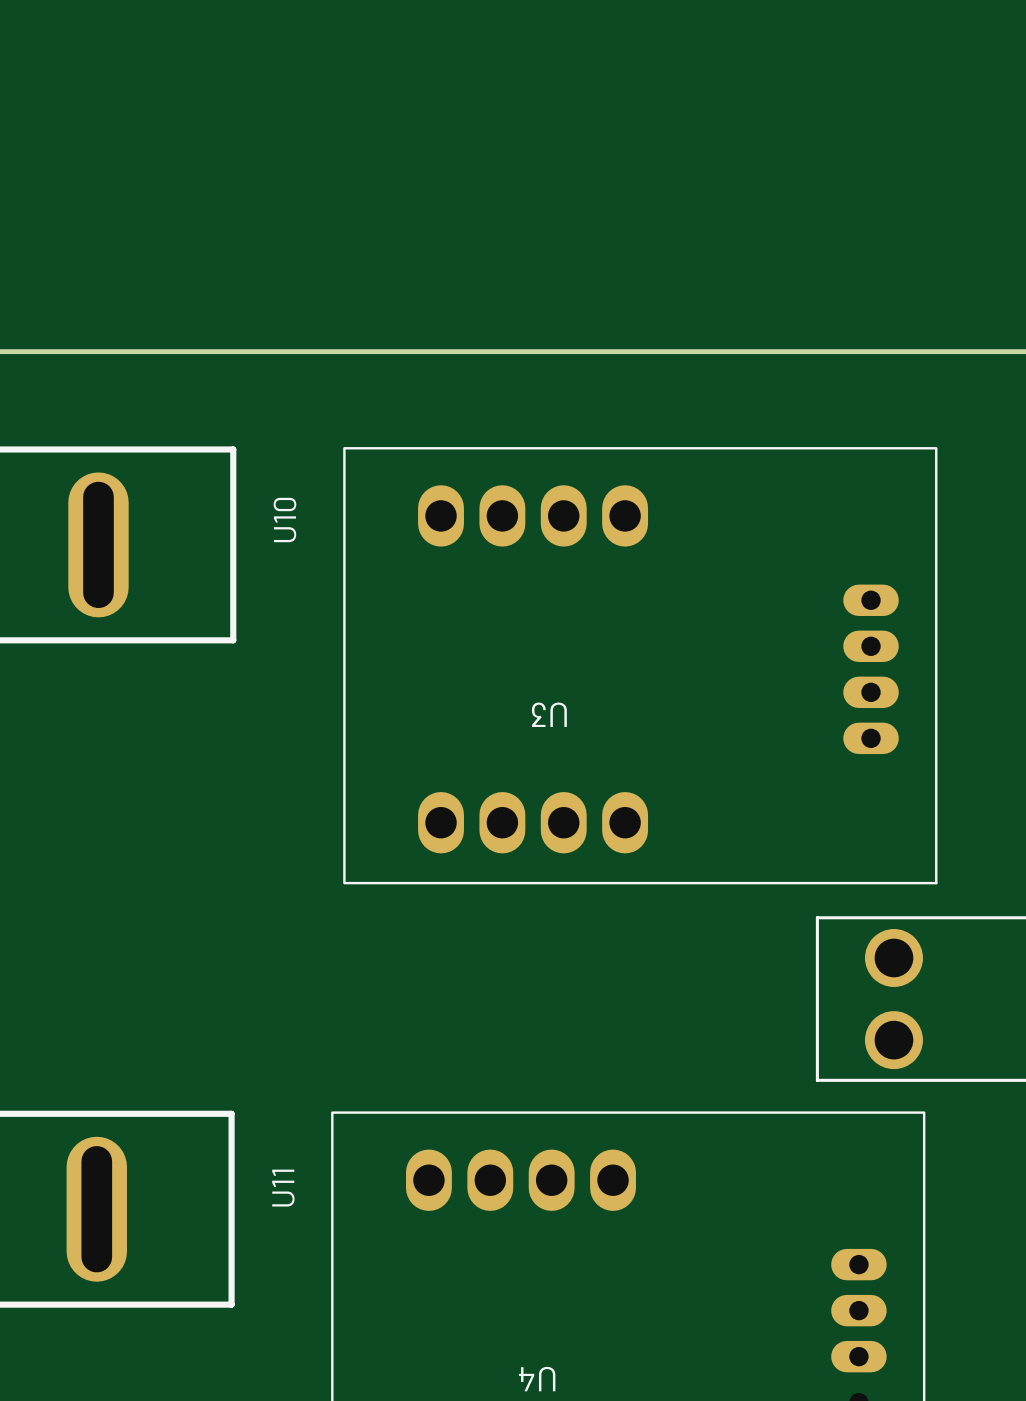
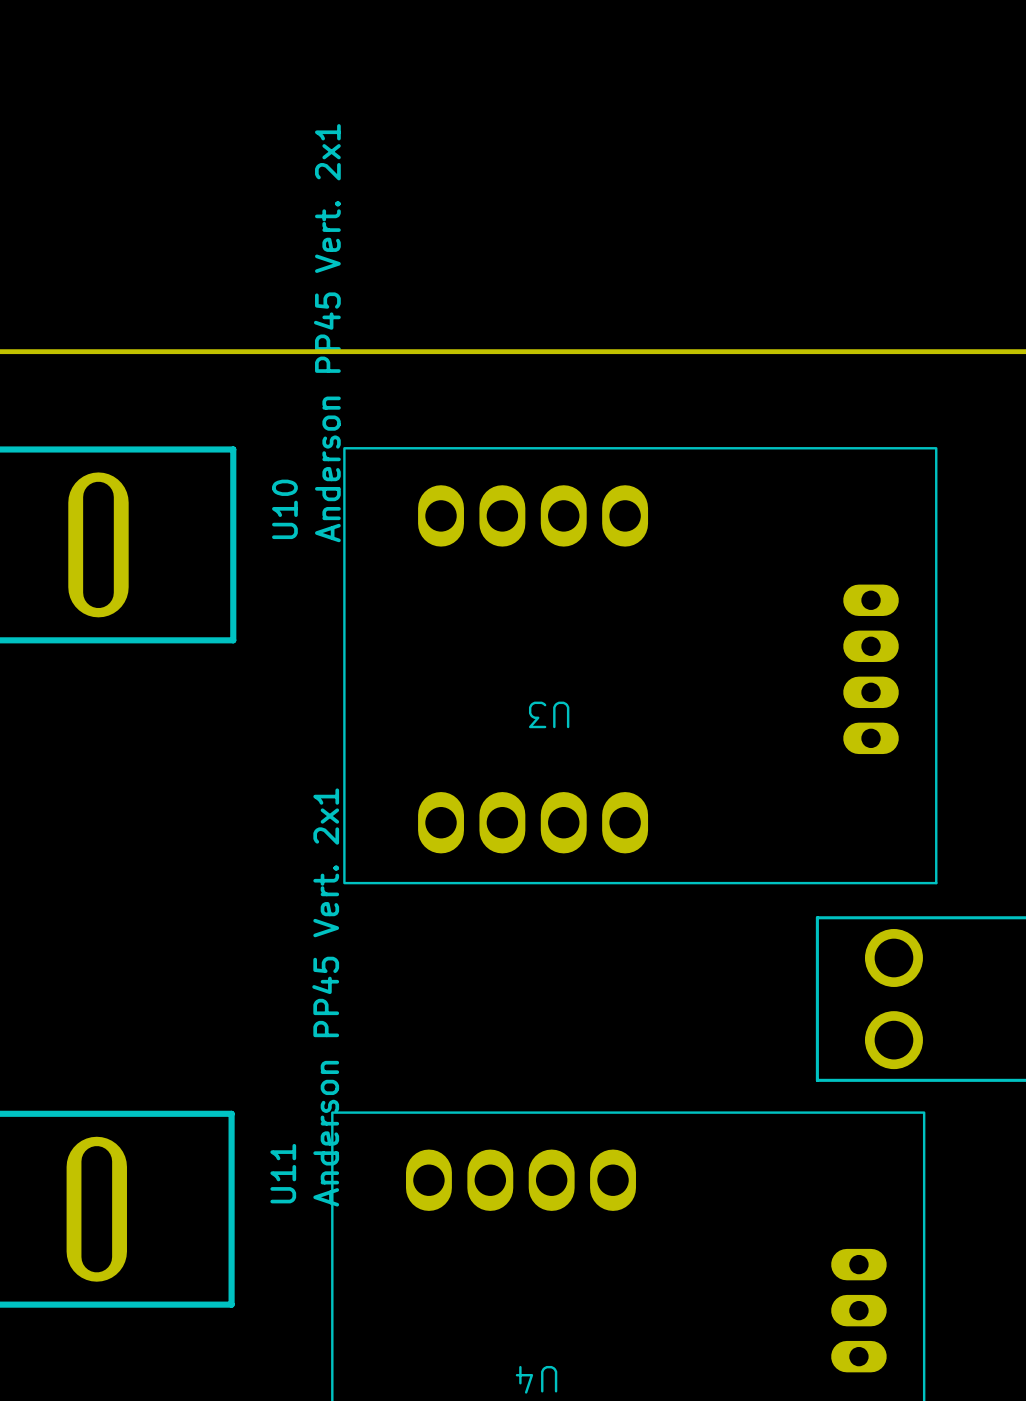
U10 value: none -> Anderson PP45 Vert. 2x1 (327, 333)
U11 value: none -> Anderson PP45 Vert. 2x1 (325, 997)

